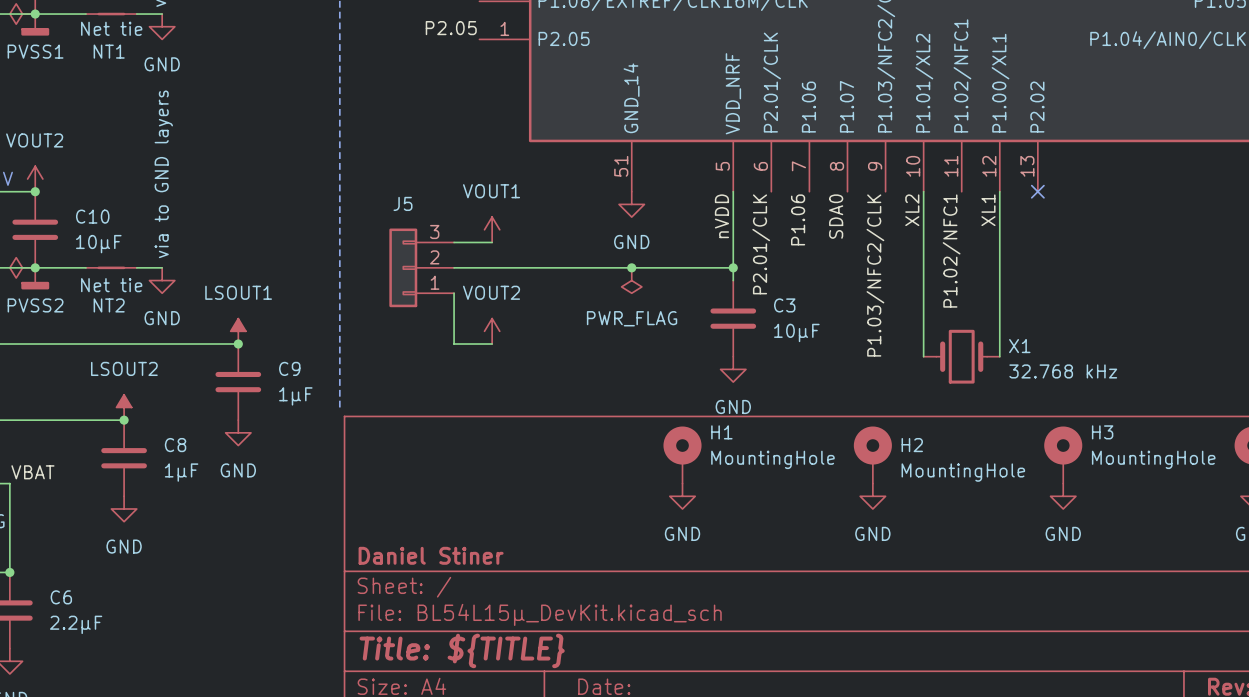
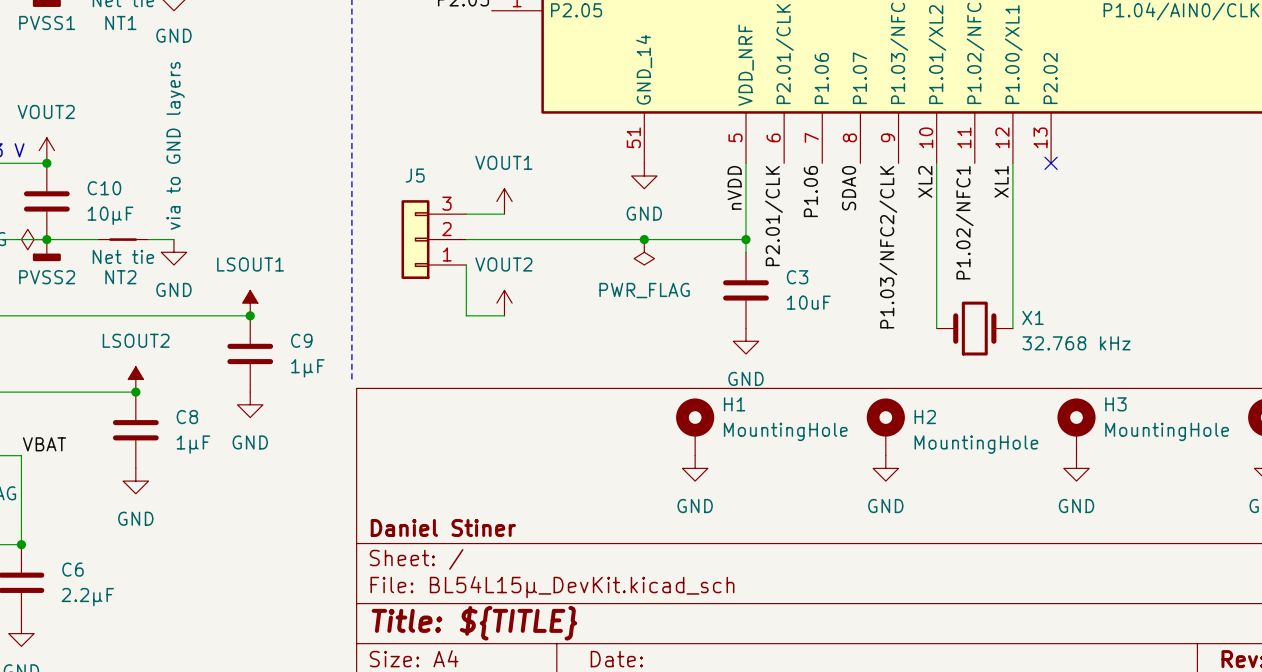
C3 value: 10μF (796, 332) -> 10uF (808, 302)

